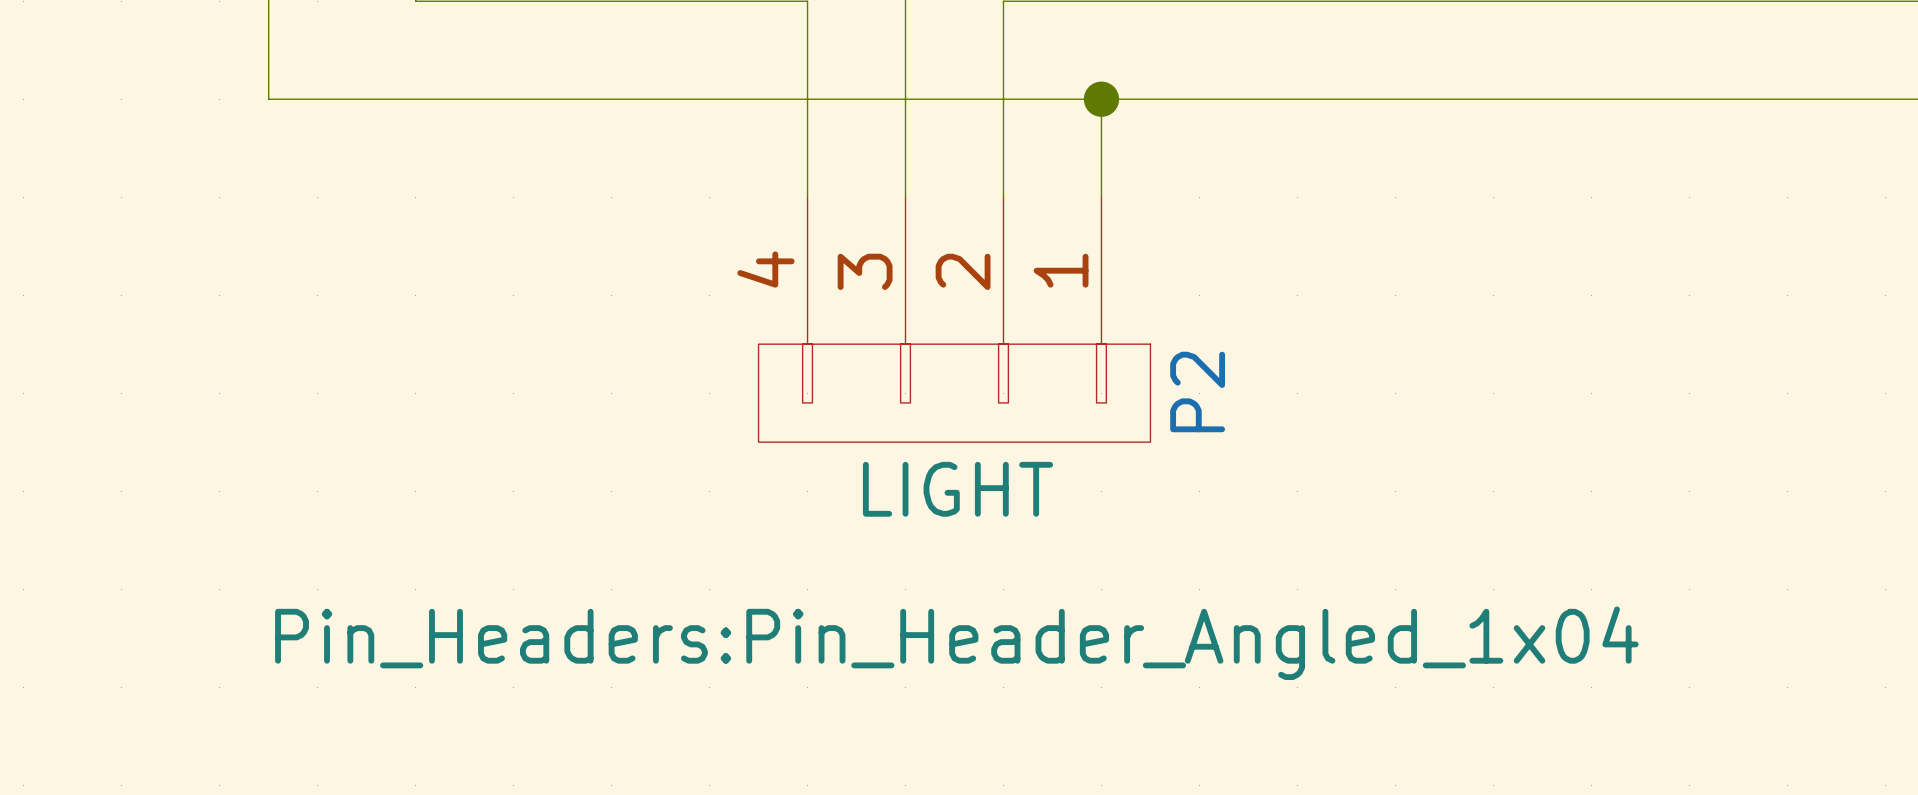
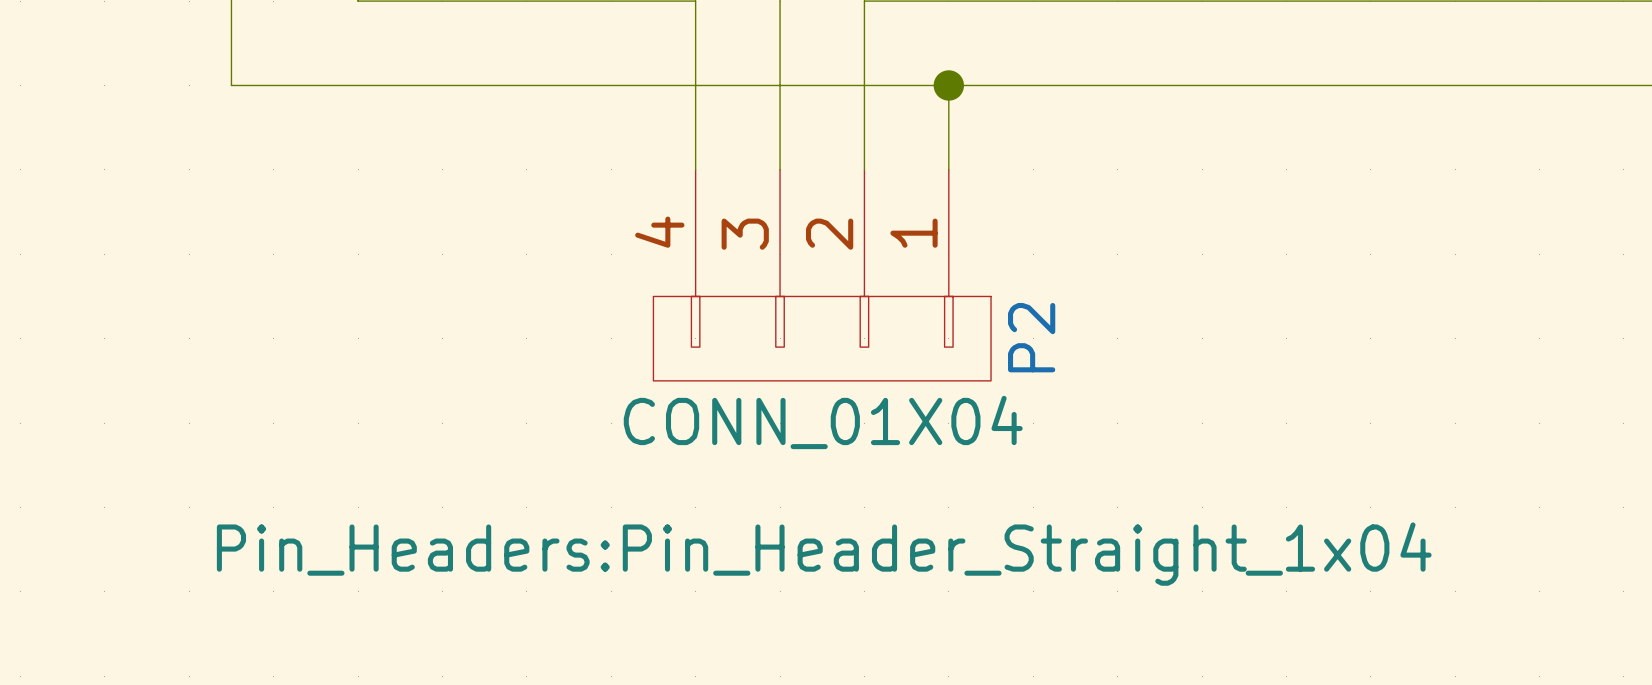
P2 value: LIGHT (958, 489) -> CONN_01X04 (823, 422)
P2 text: Pin_Headers:Pin_Header_Angled_1x04 (956, 643) -> Pin_Headers:Pin_Header_Straight_1x04 (824, 554)

